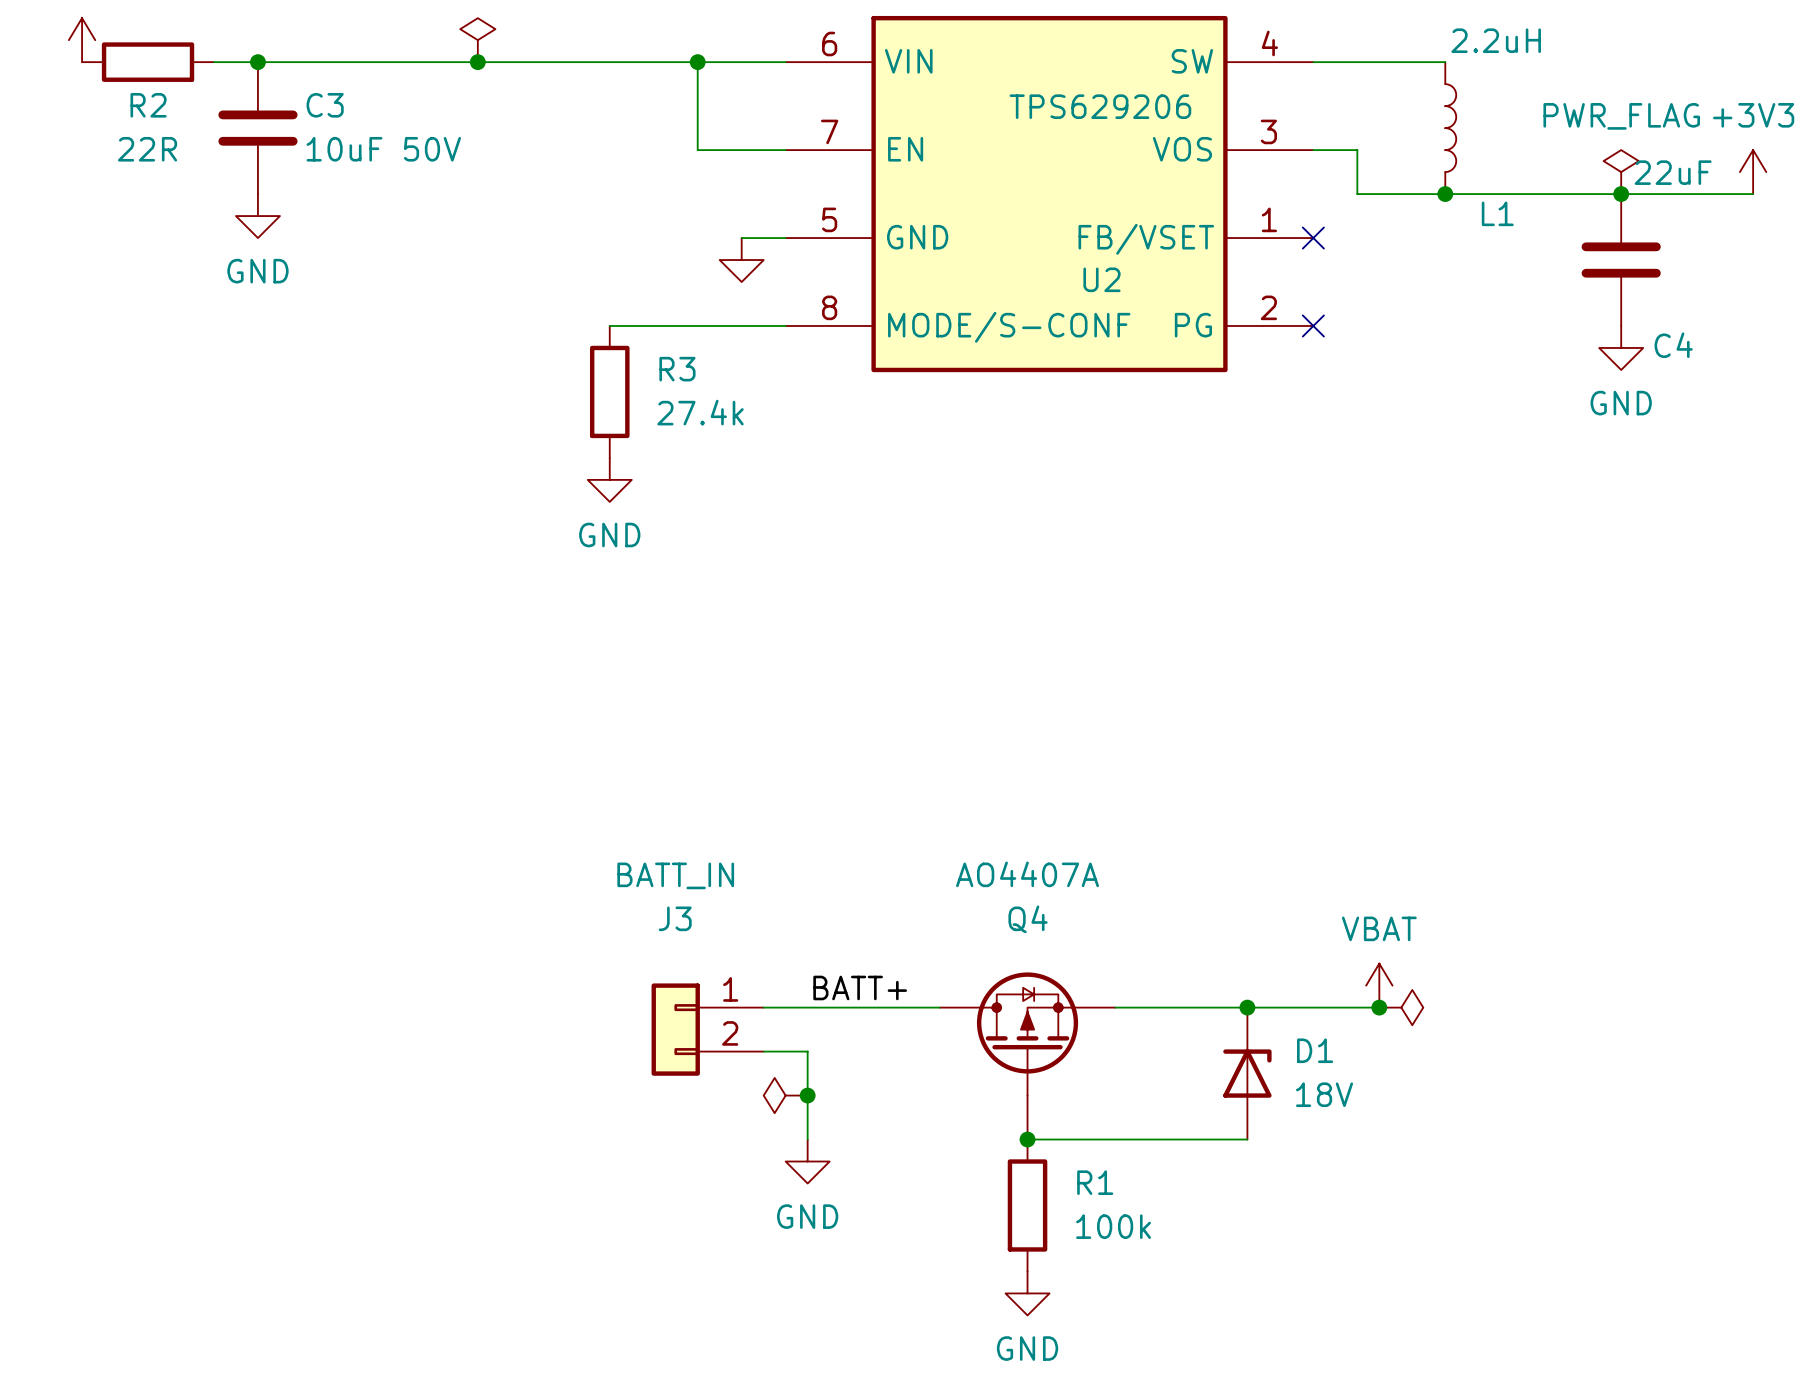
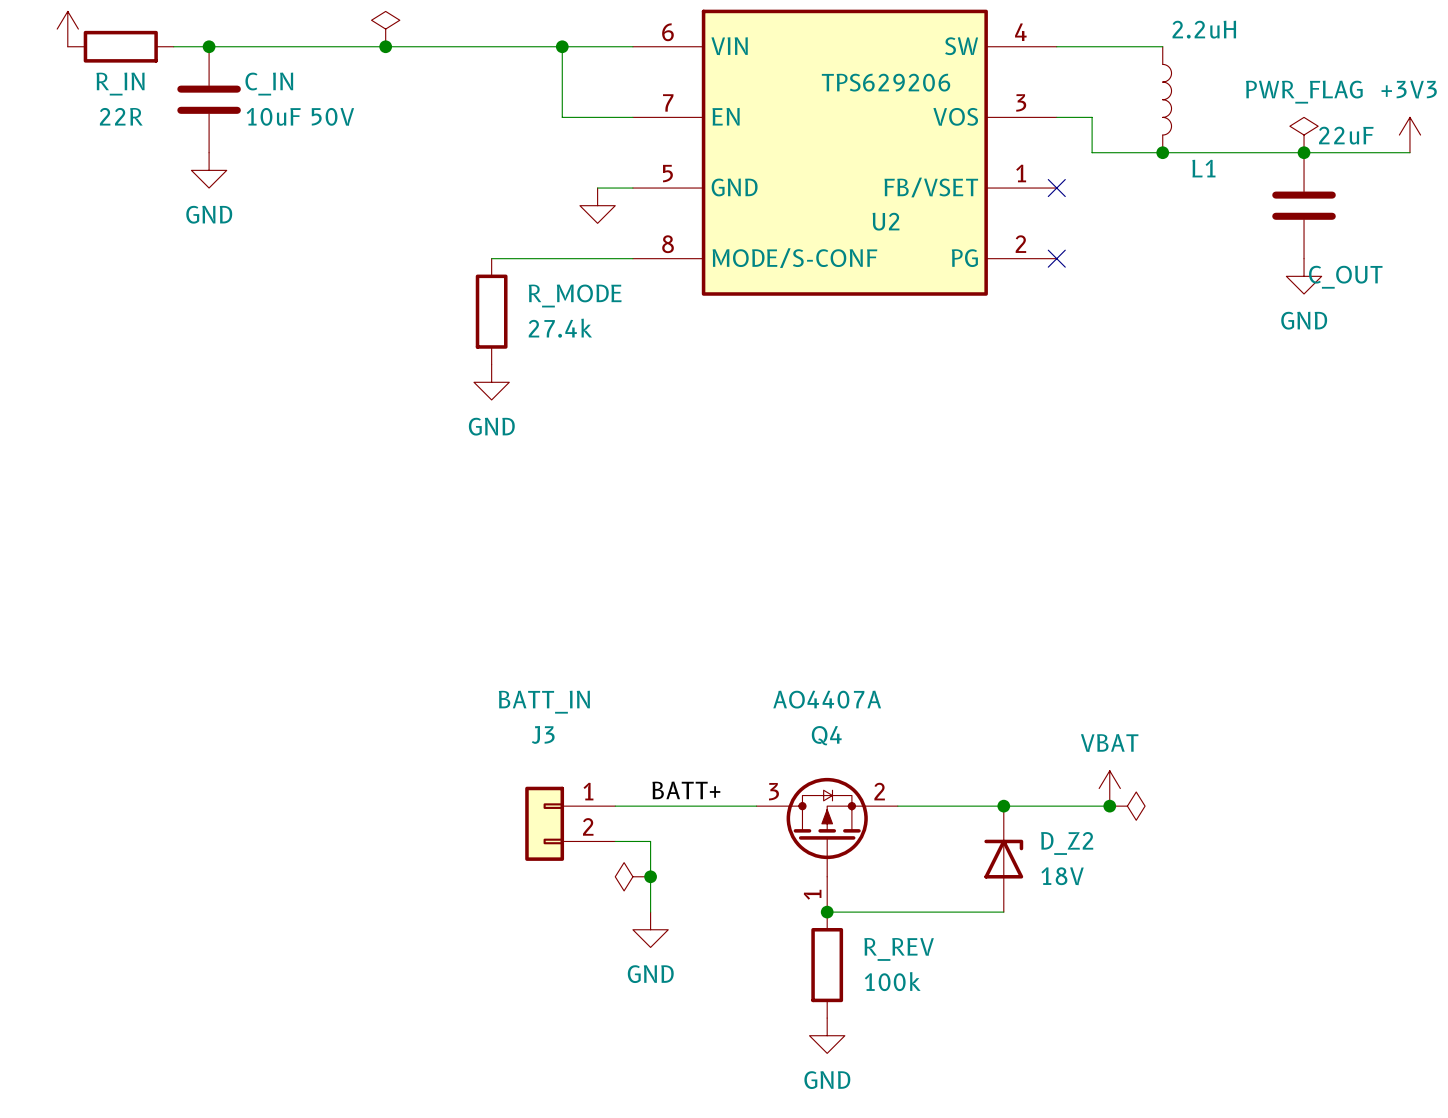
R2 name: R2 (148, 105) -> R_IN (120, 84)
C3 name: C3 (325, 105) -> C_IN (269, 84)
C4 name: C4 (1673, 345) -> C_OUT (1345, 277)
R3 name: R3 (677, 369) -> R_MODE (575, 295)
Q4 pin number: none -> 3 (773, 791)
Q4 pin number: none -> 2 (879, 791)
D1 name: D1 (1315, 1050) -> D_Z2 (1067, 843)
Q4 pin number: none -> 1 (812, 894)
R1 name: R1 (1095, 1182) -> R_REV (899, 949)

